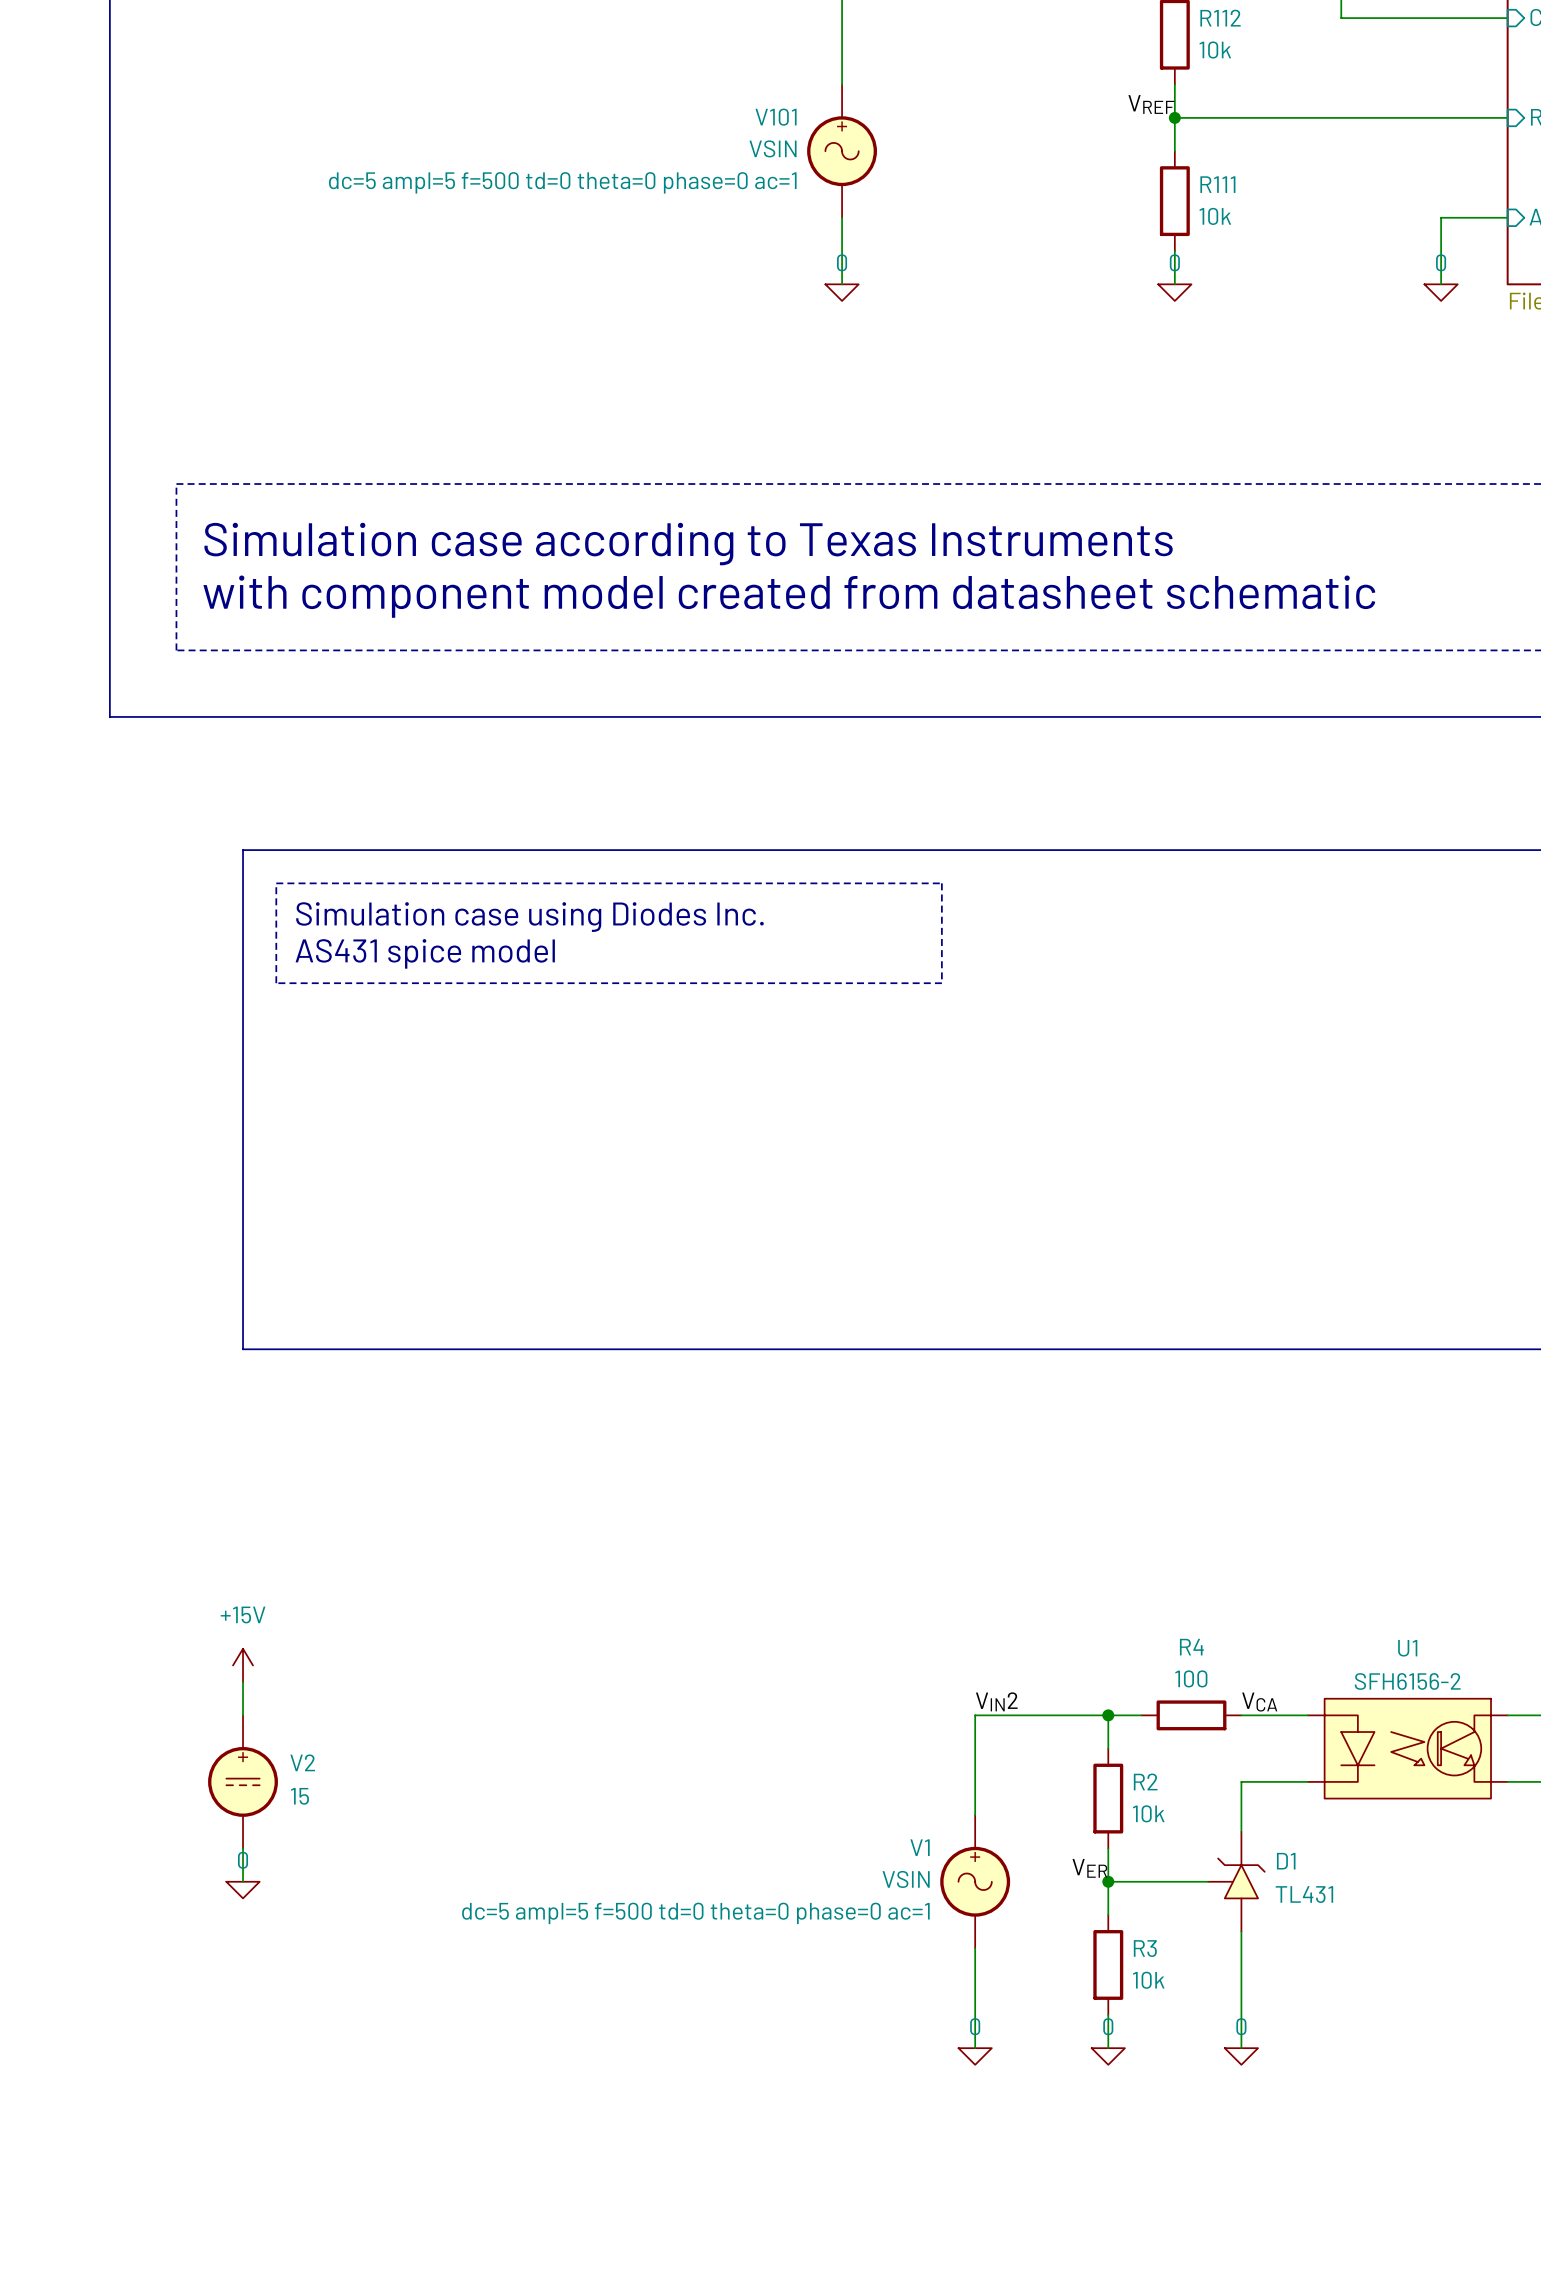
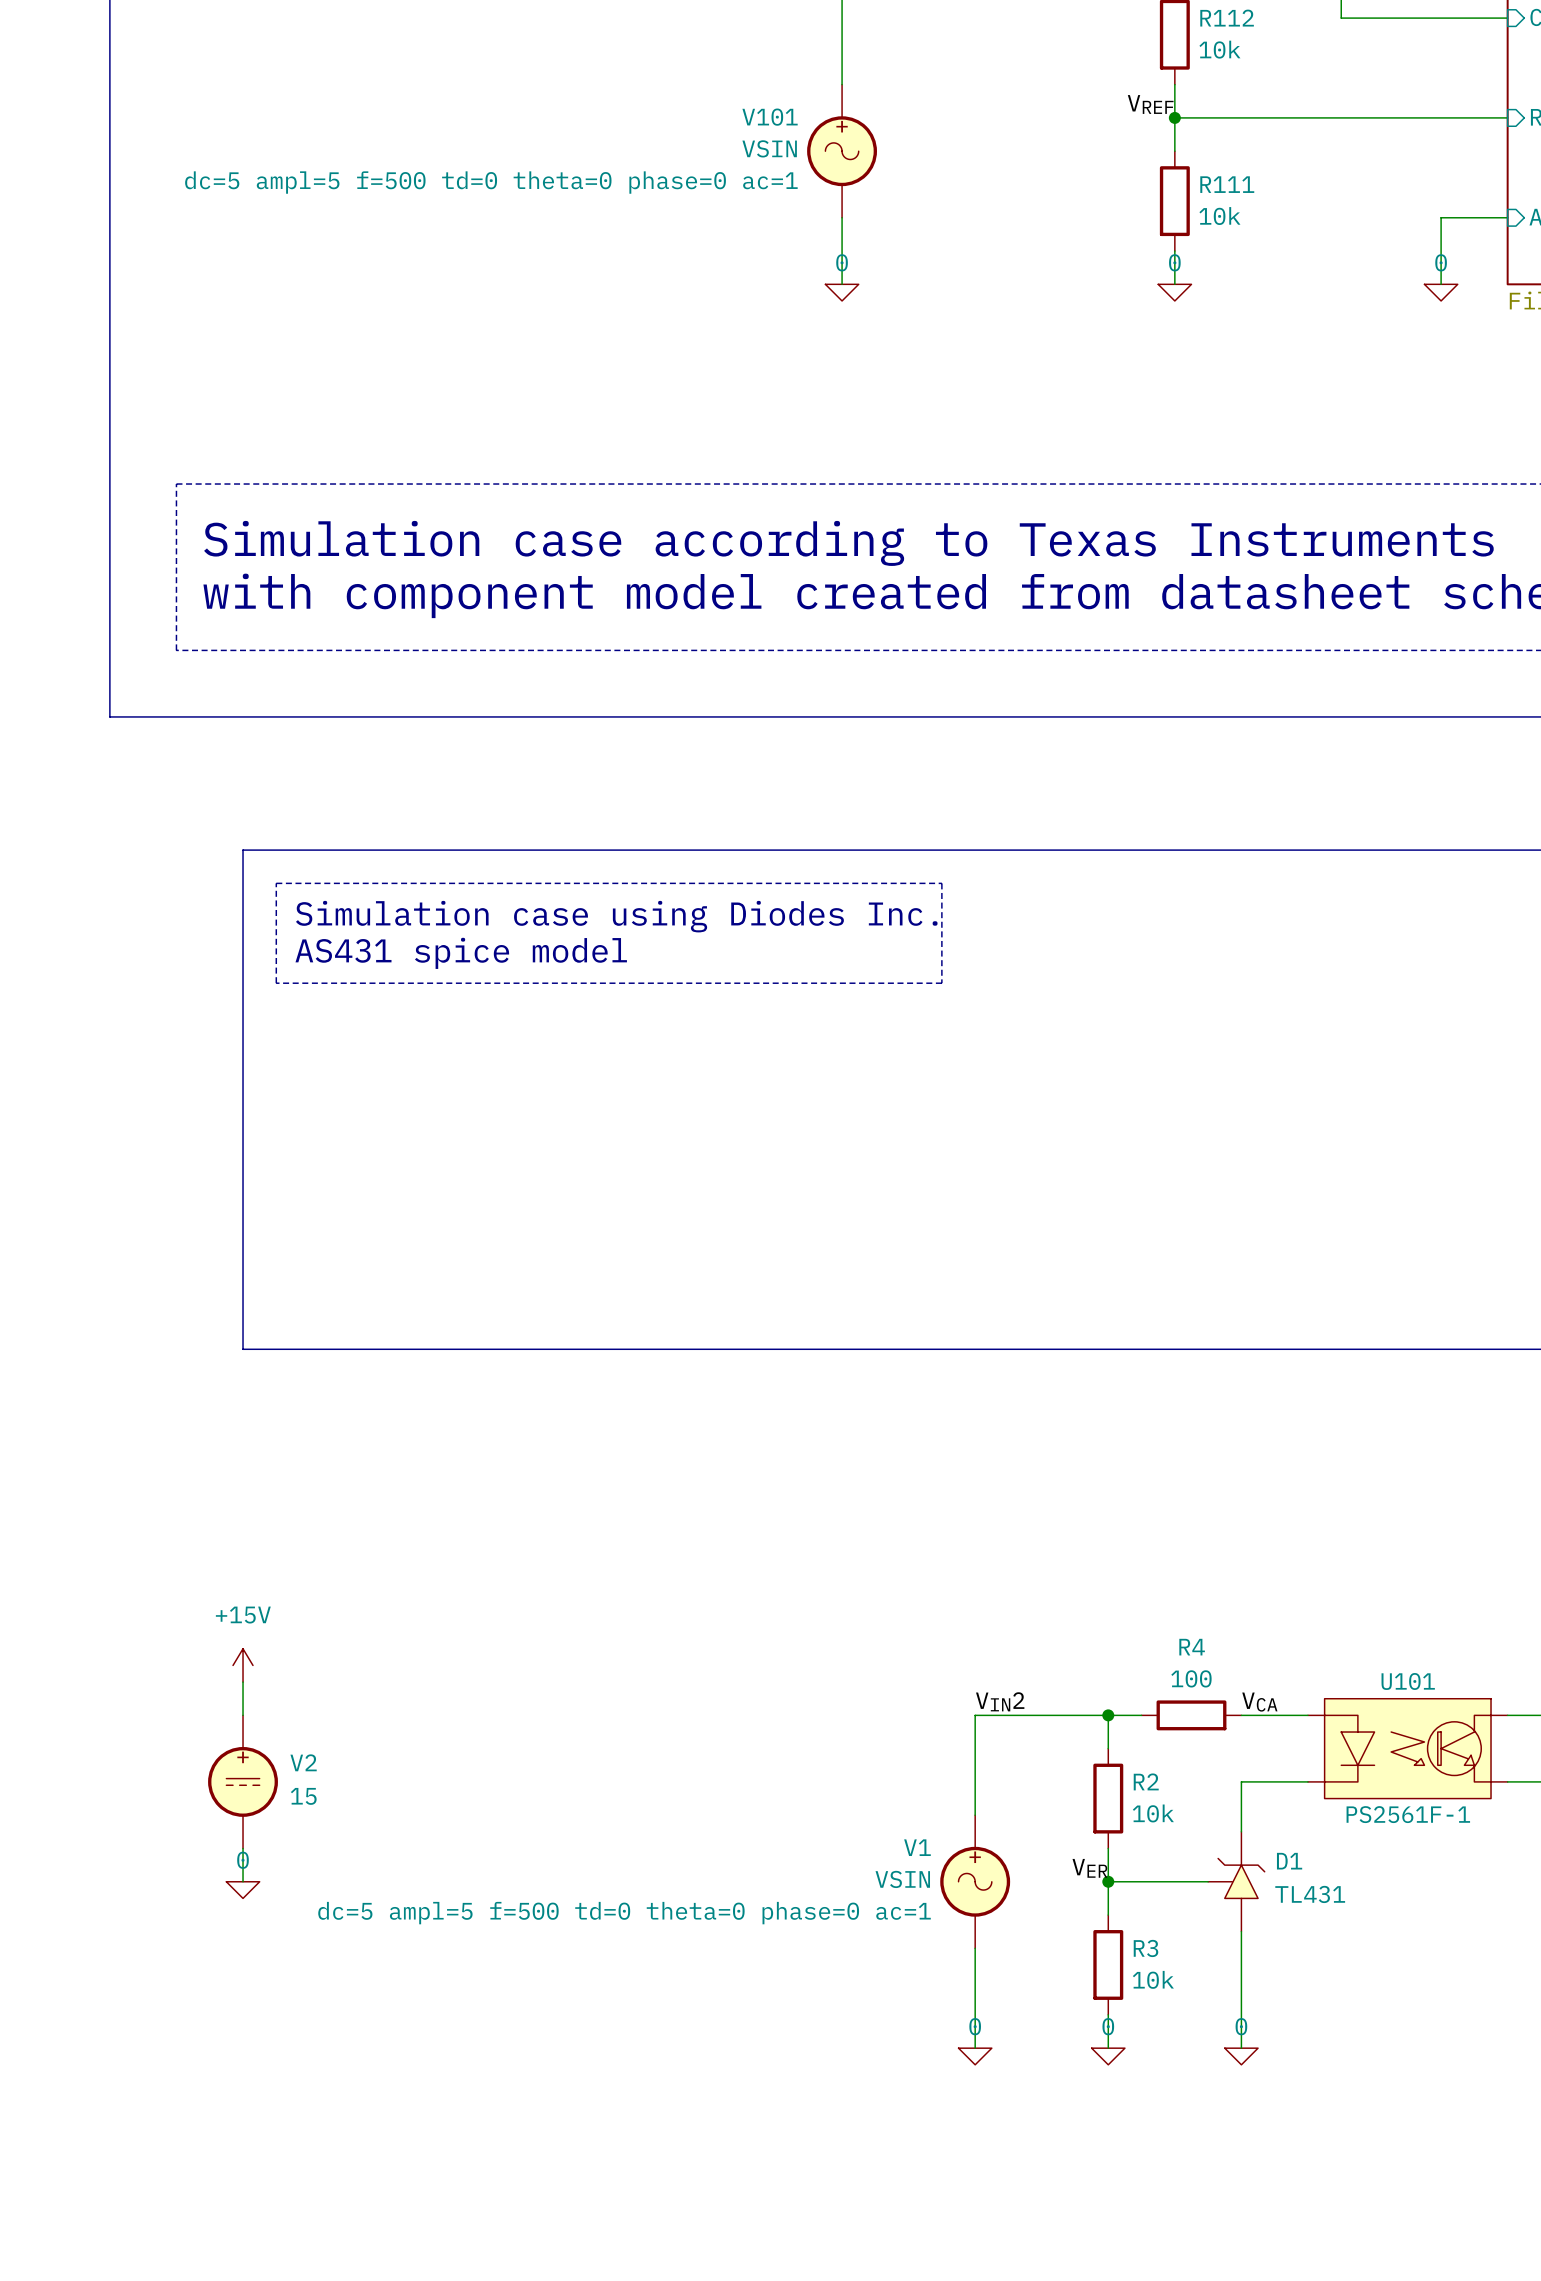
U1 name: U1 (1407, 1648) -> U101 (1408, 1681)
U1 value: SFH6156-2 (1407, 1681) -> PS2561F-1 (1408, 1814)

